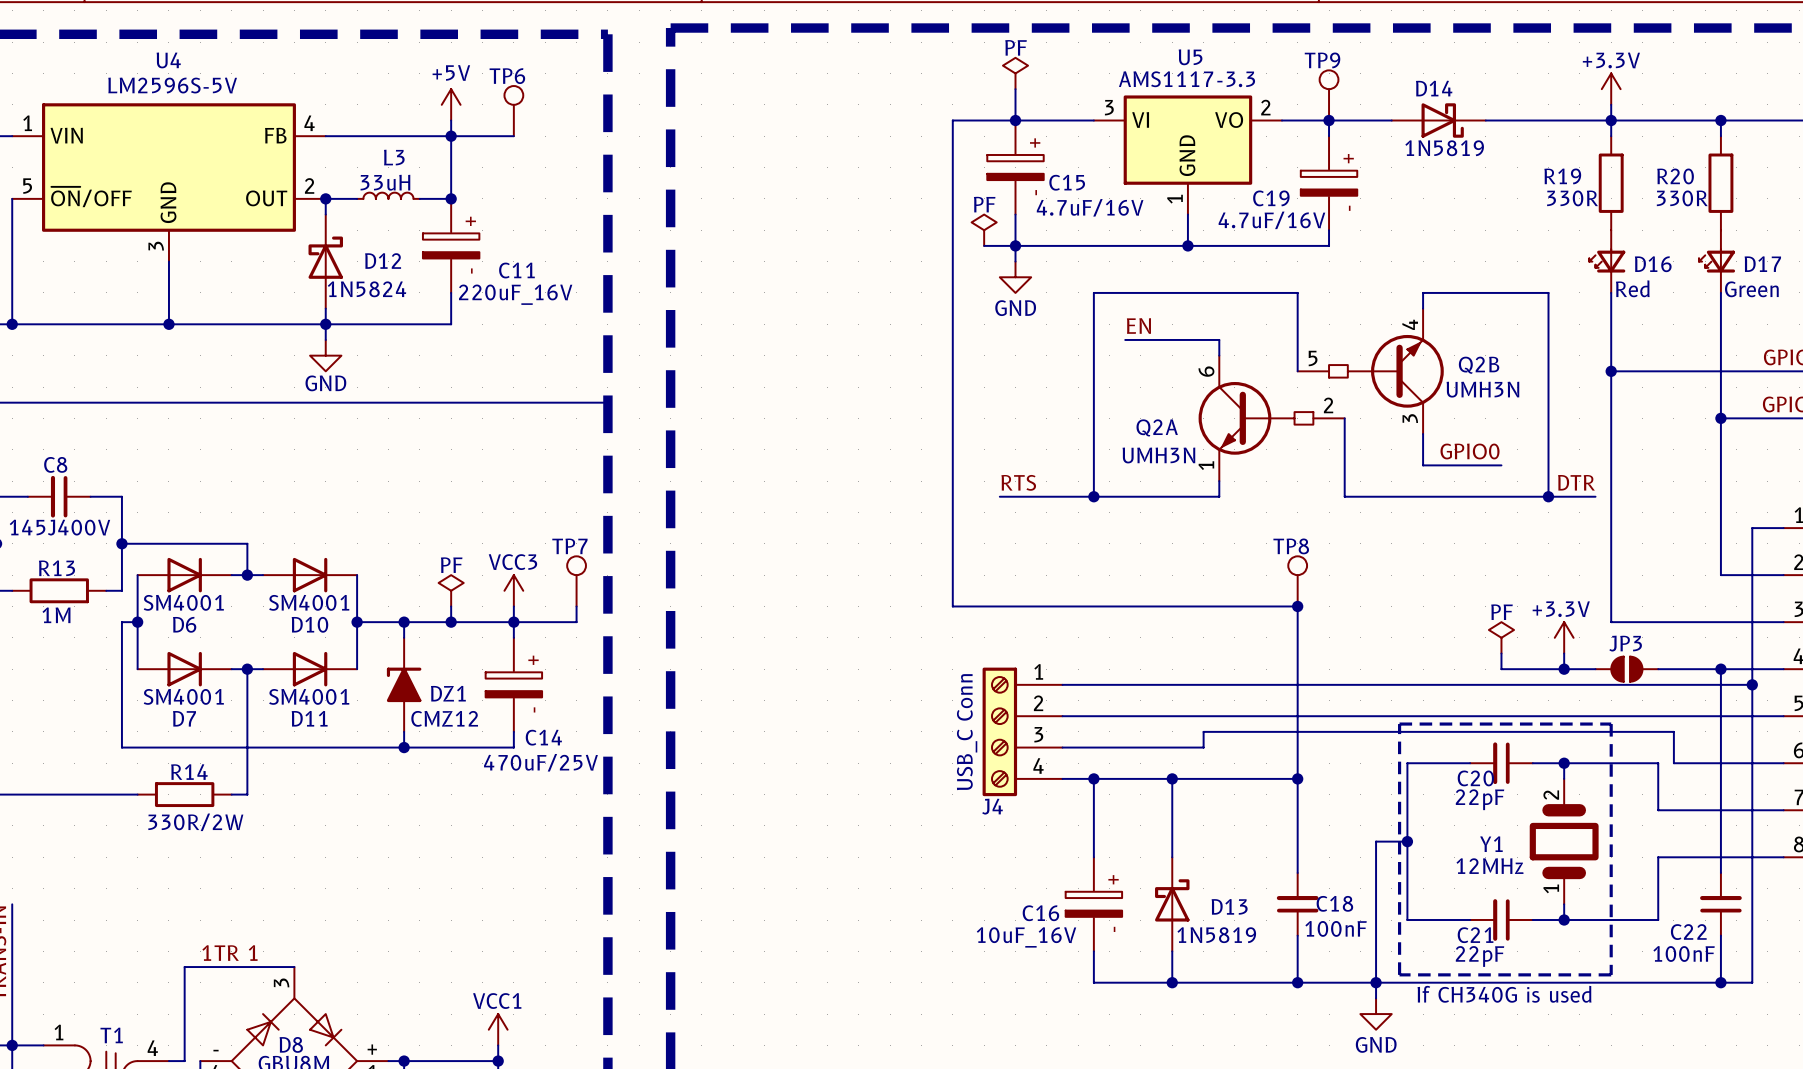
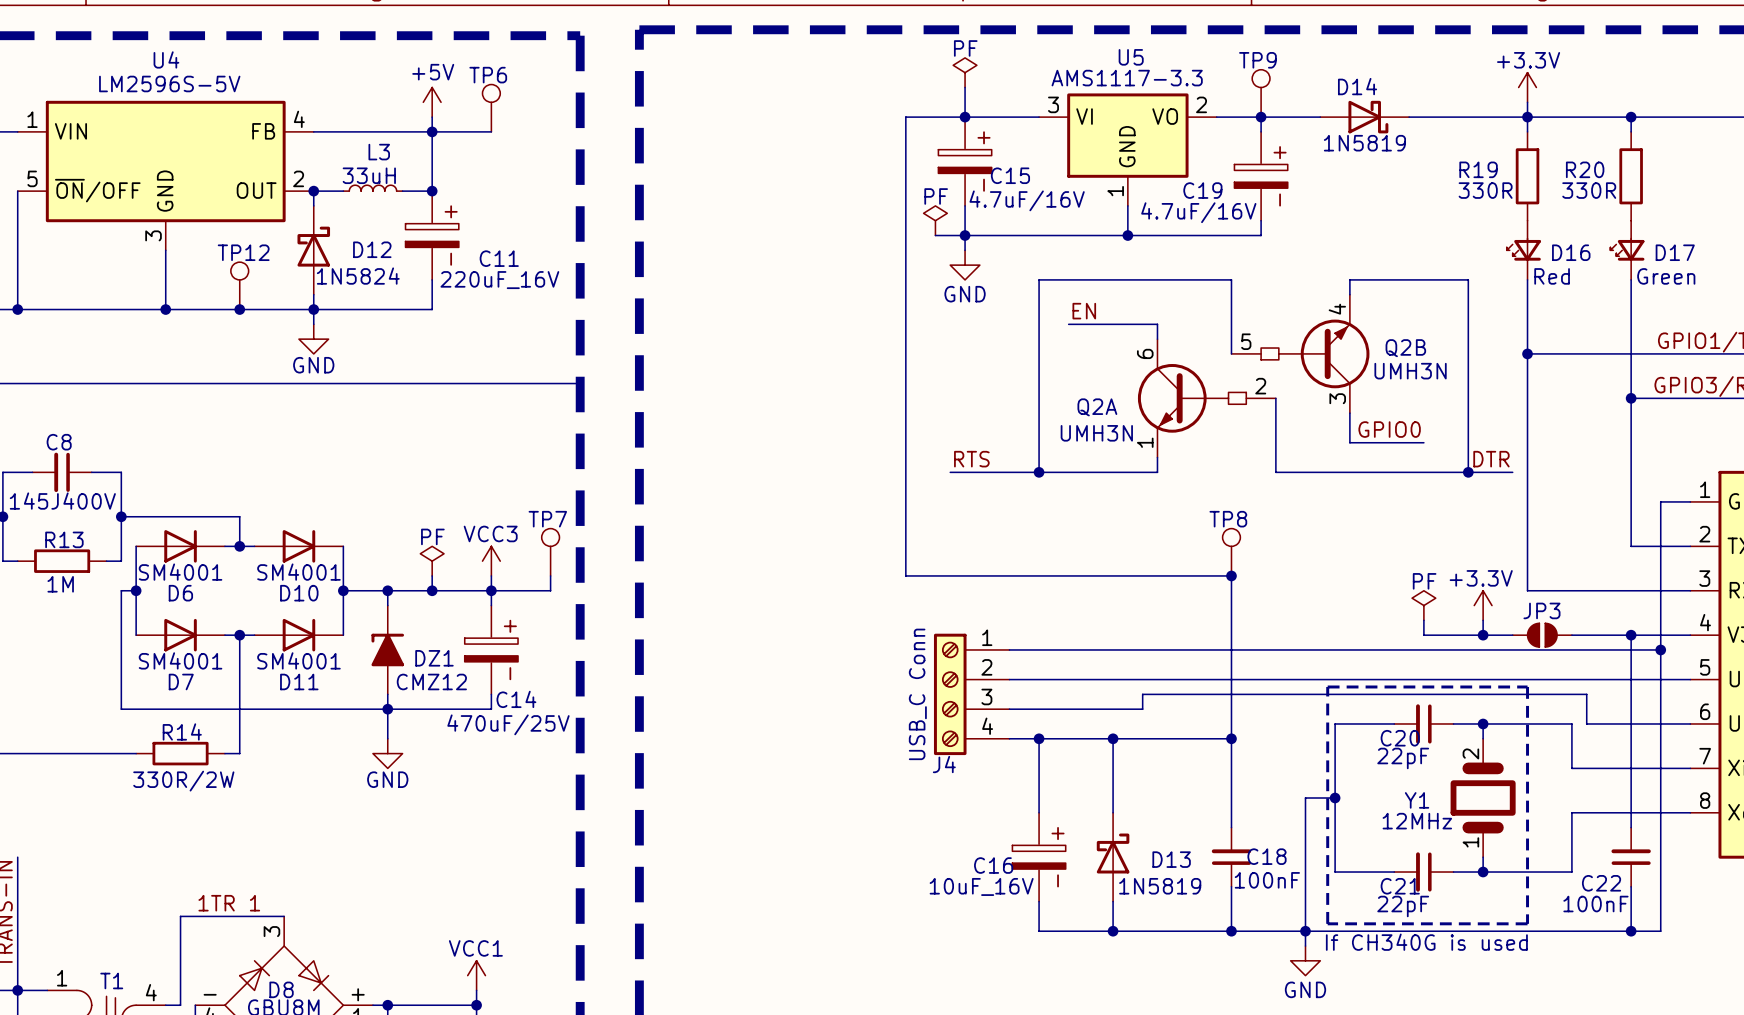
TP12: none -> (239, 285)
junction: none -> (239, 309)
wire: none -> (387, 709) (387, 738)
power symbol: none -> GND (387, 753)

